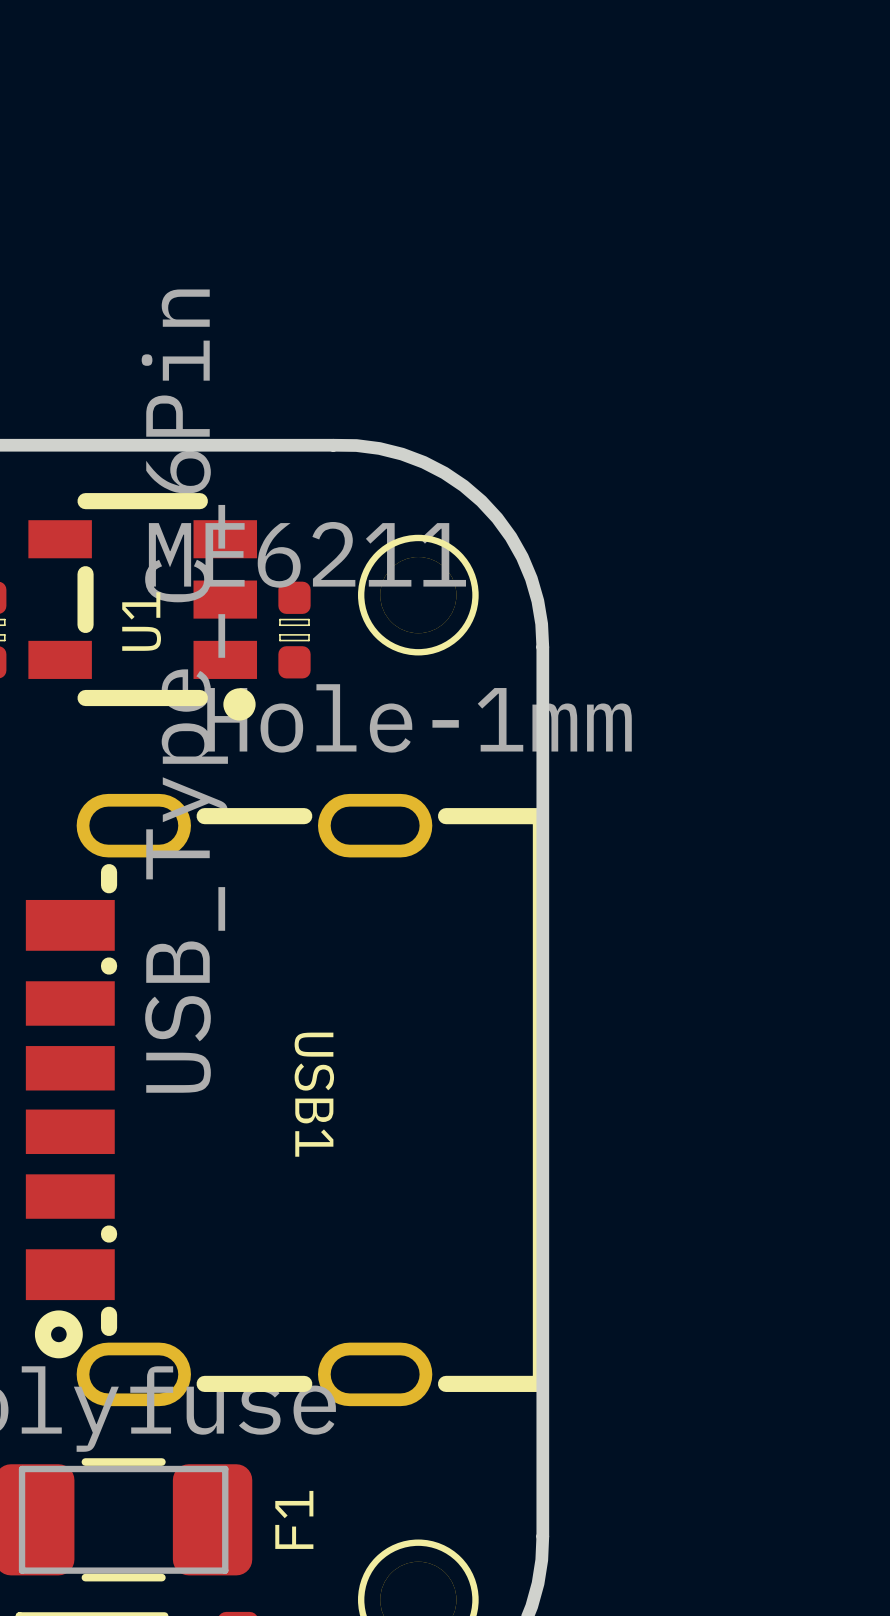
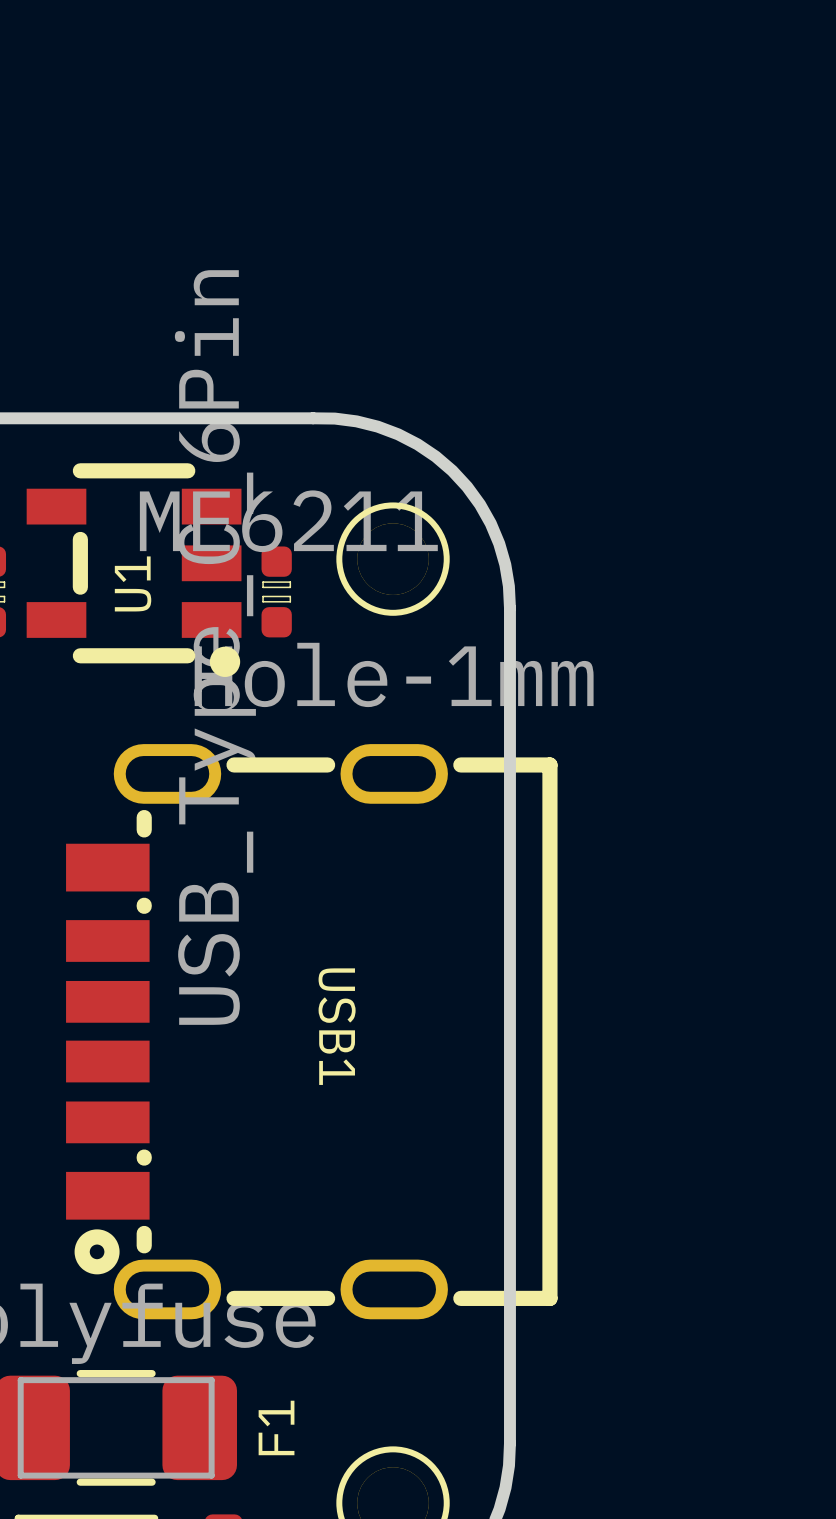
USB1 position: (287, 1100) -> (311, 1031)

